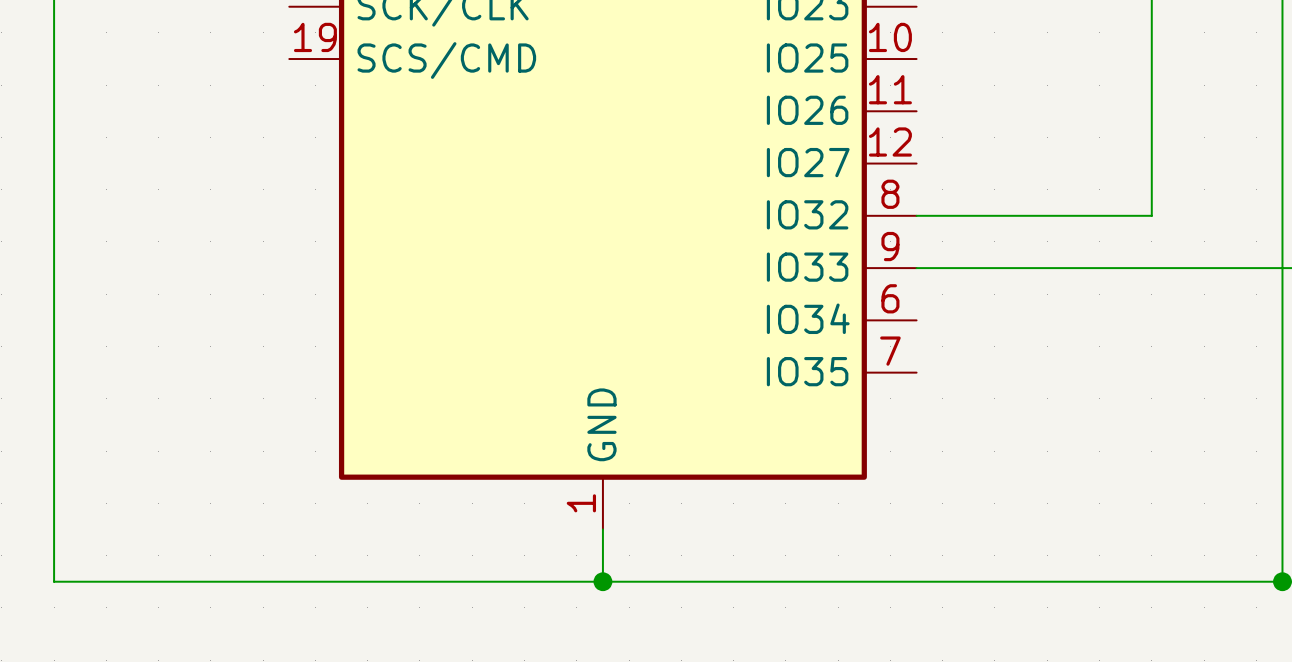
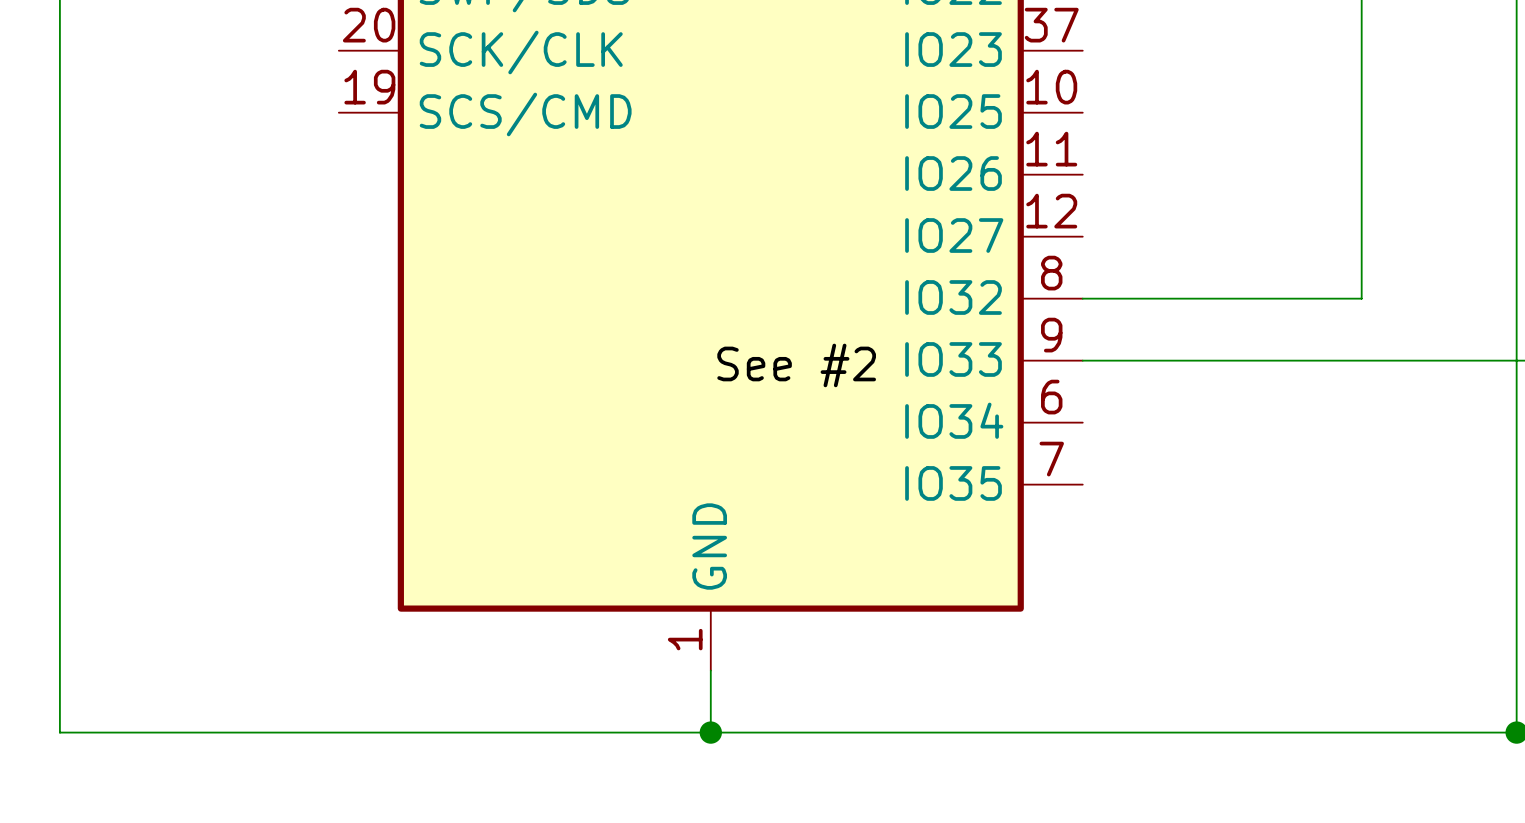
label: none -> See #2 (796, 365)

